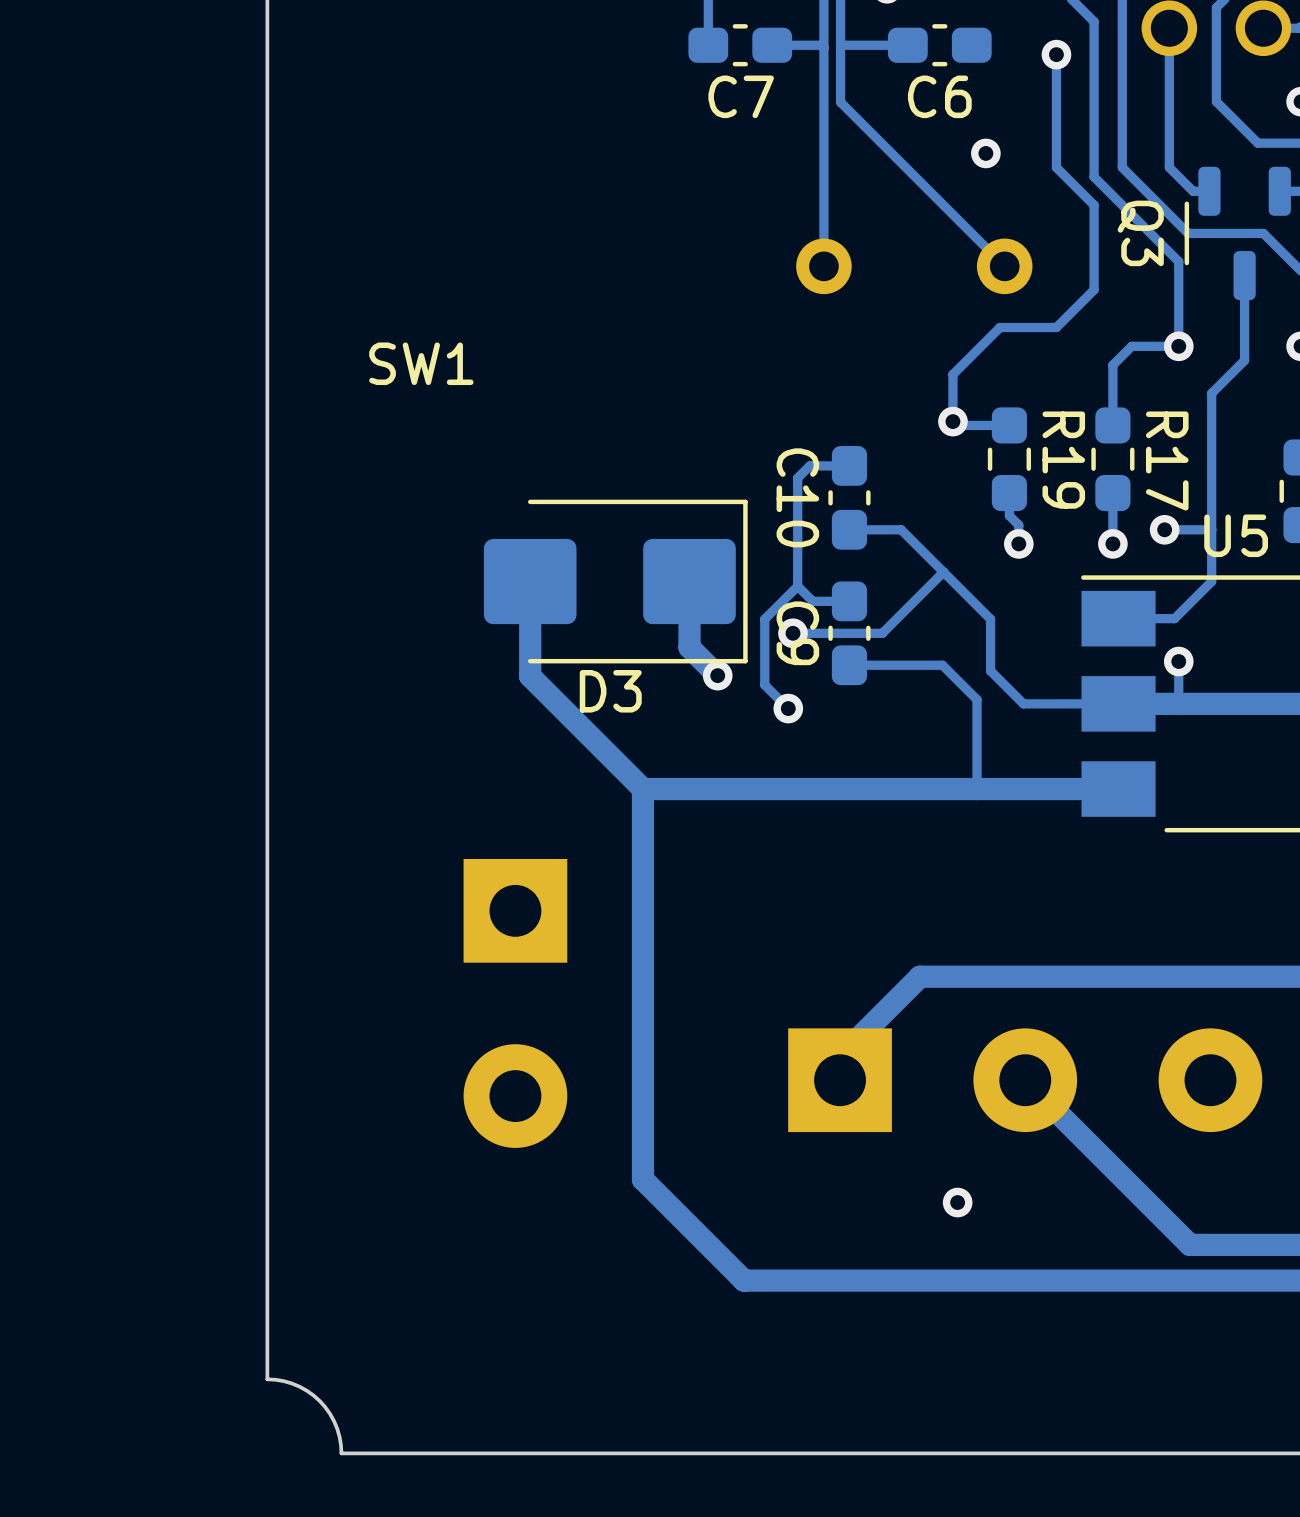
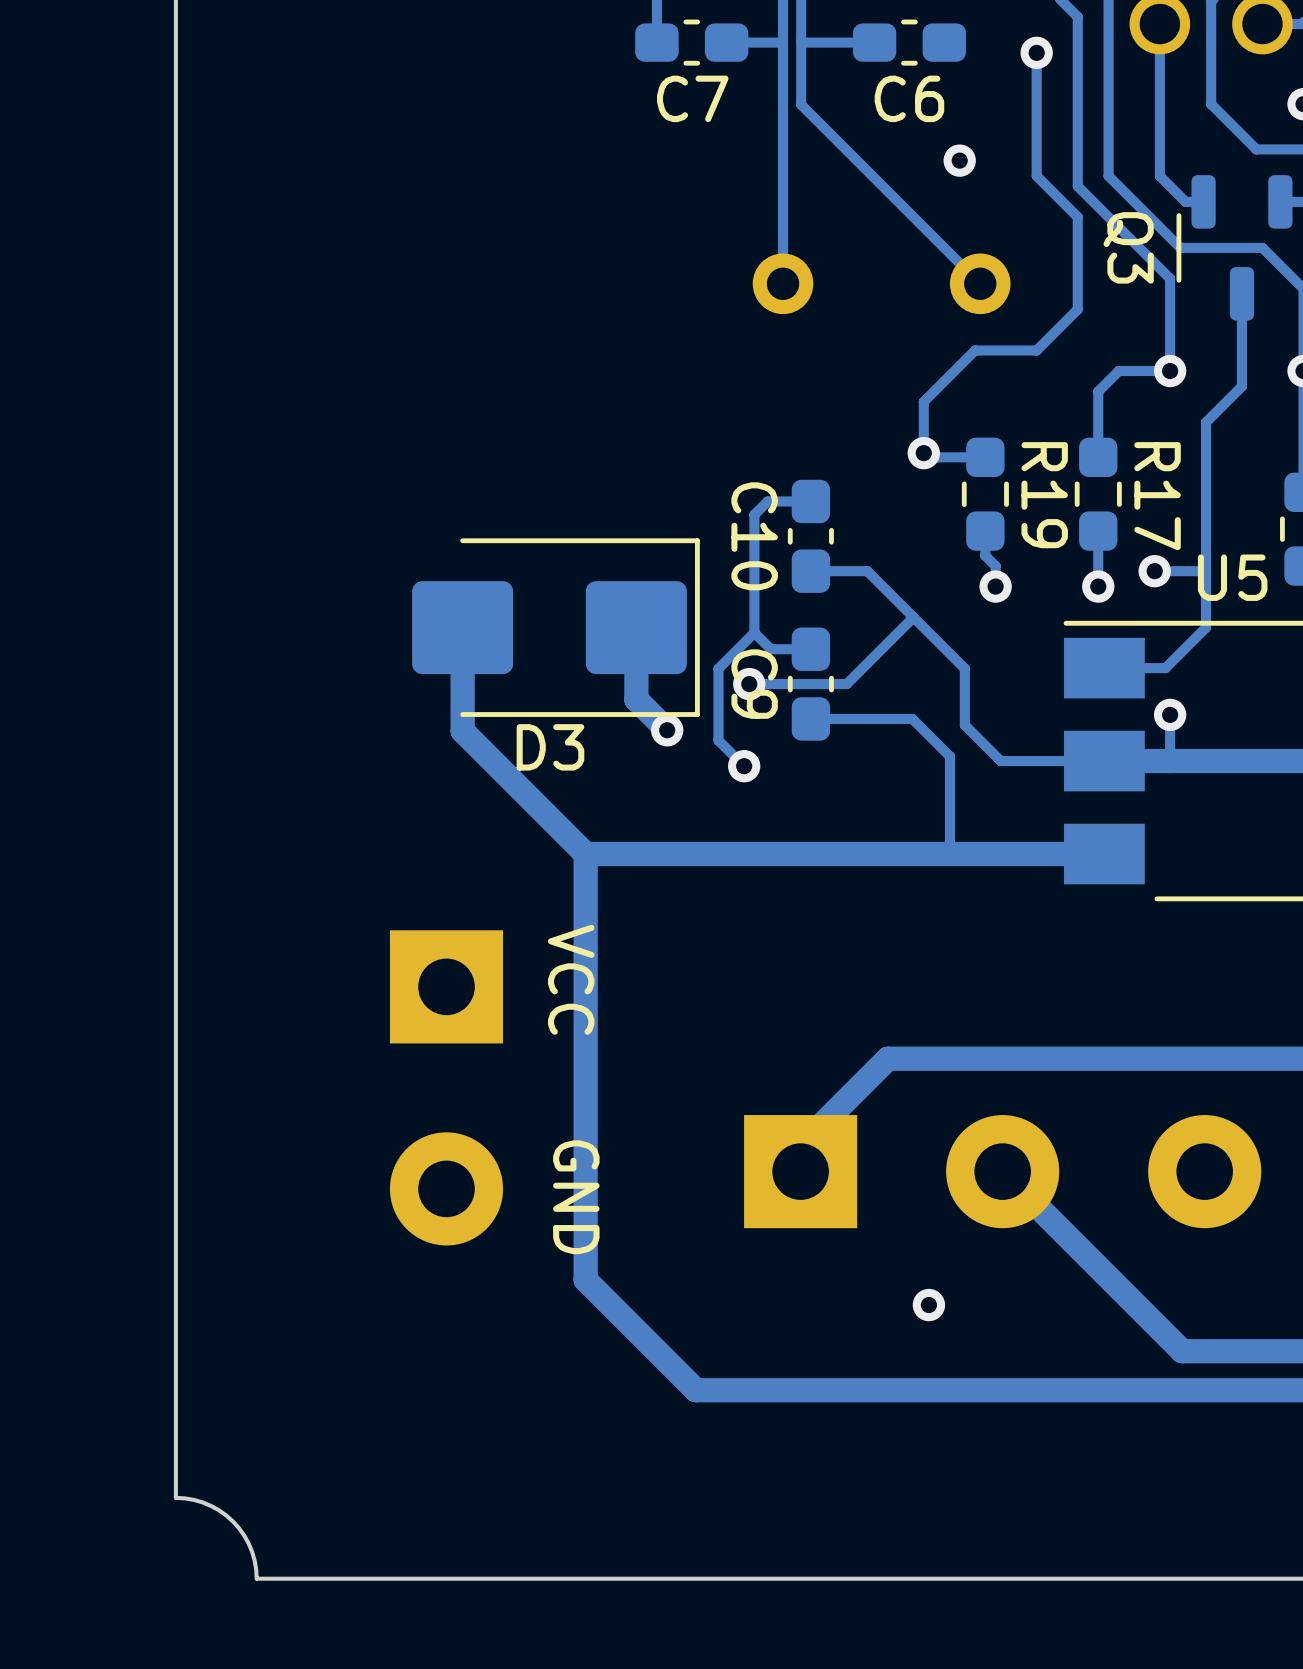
SW1: (421, 363) -> none
text: none -> VCC (571, 979)
text: none -> GND (576, 1197)

